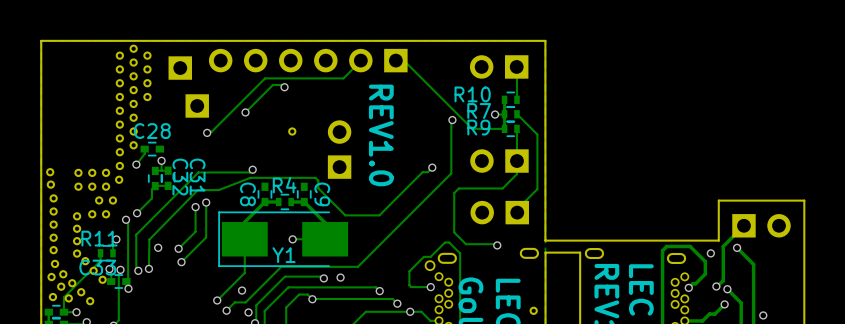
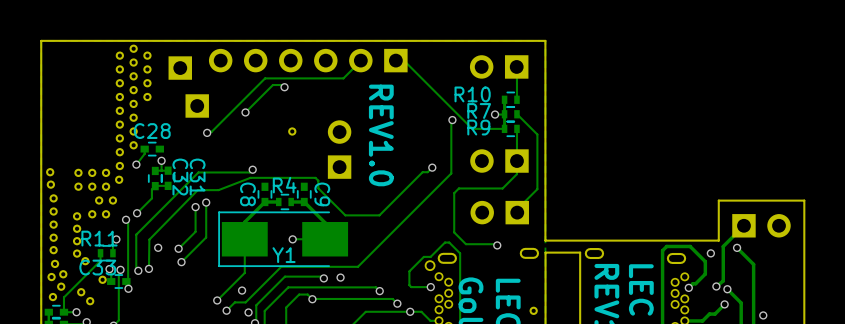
part: (93, 270) -> none
part: (72, 283) -> none
part: (68, 298) -> none

